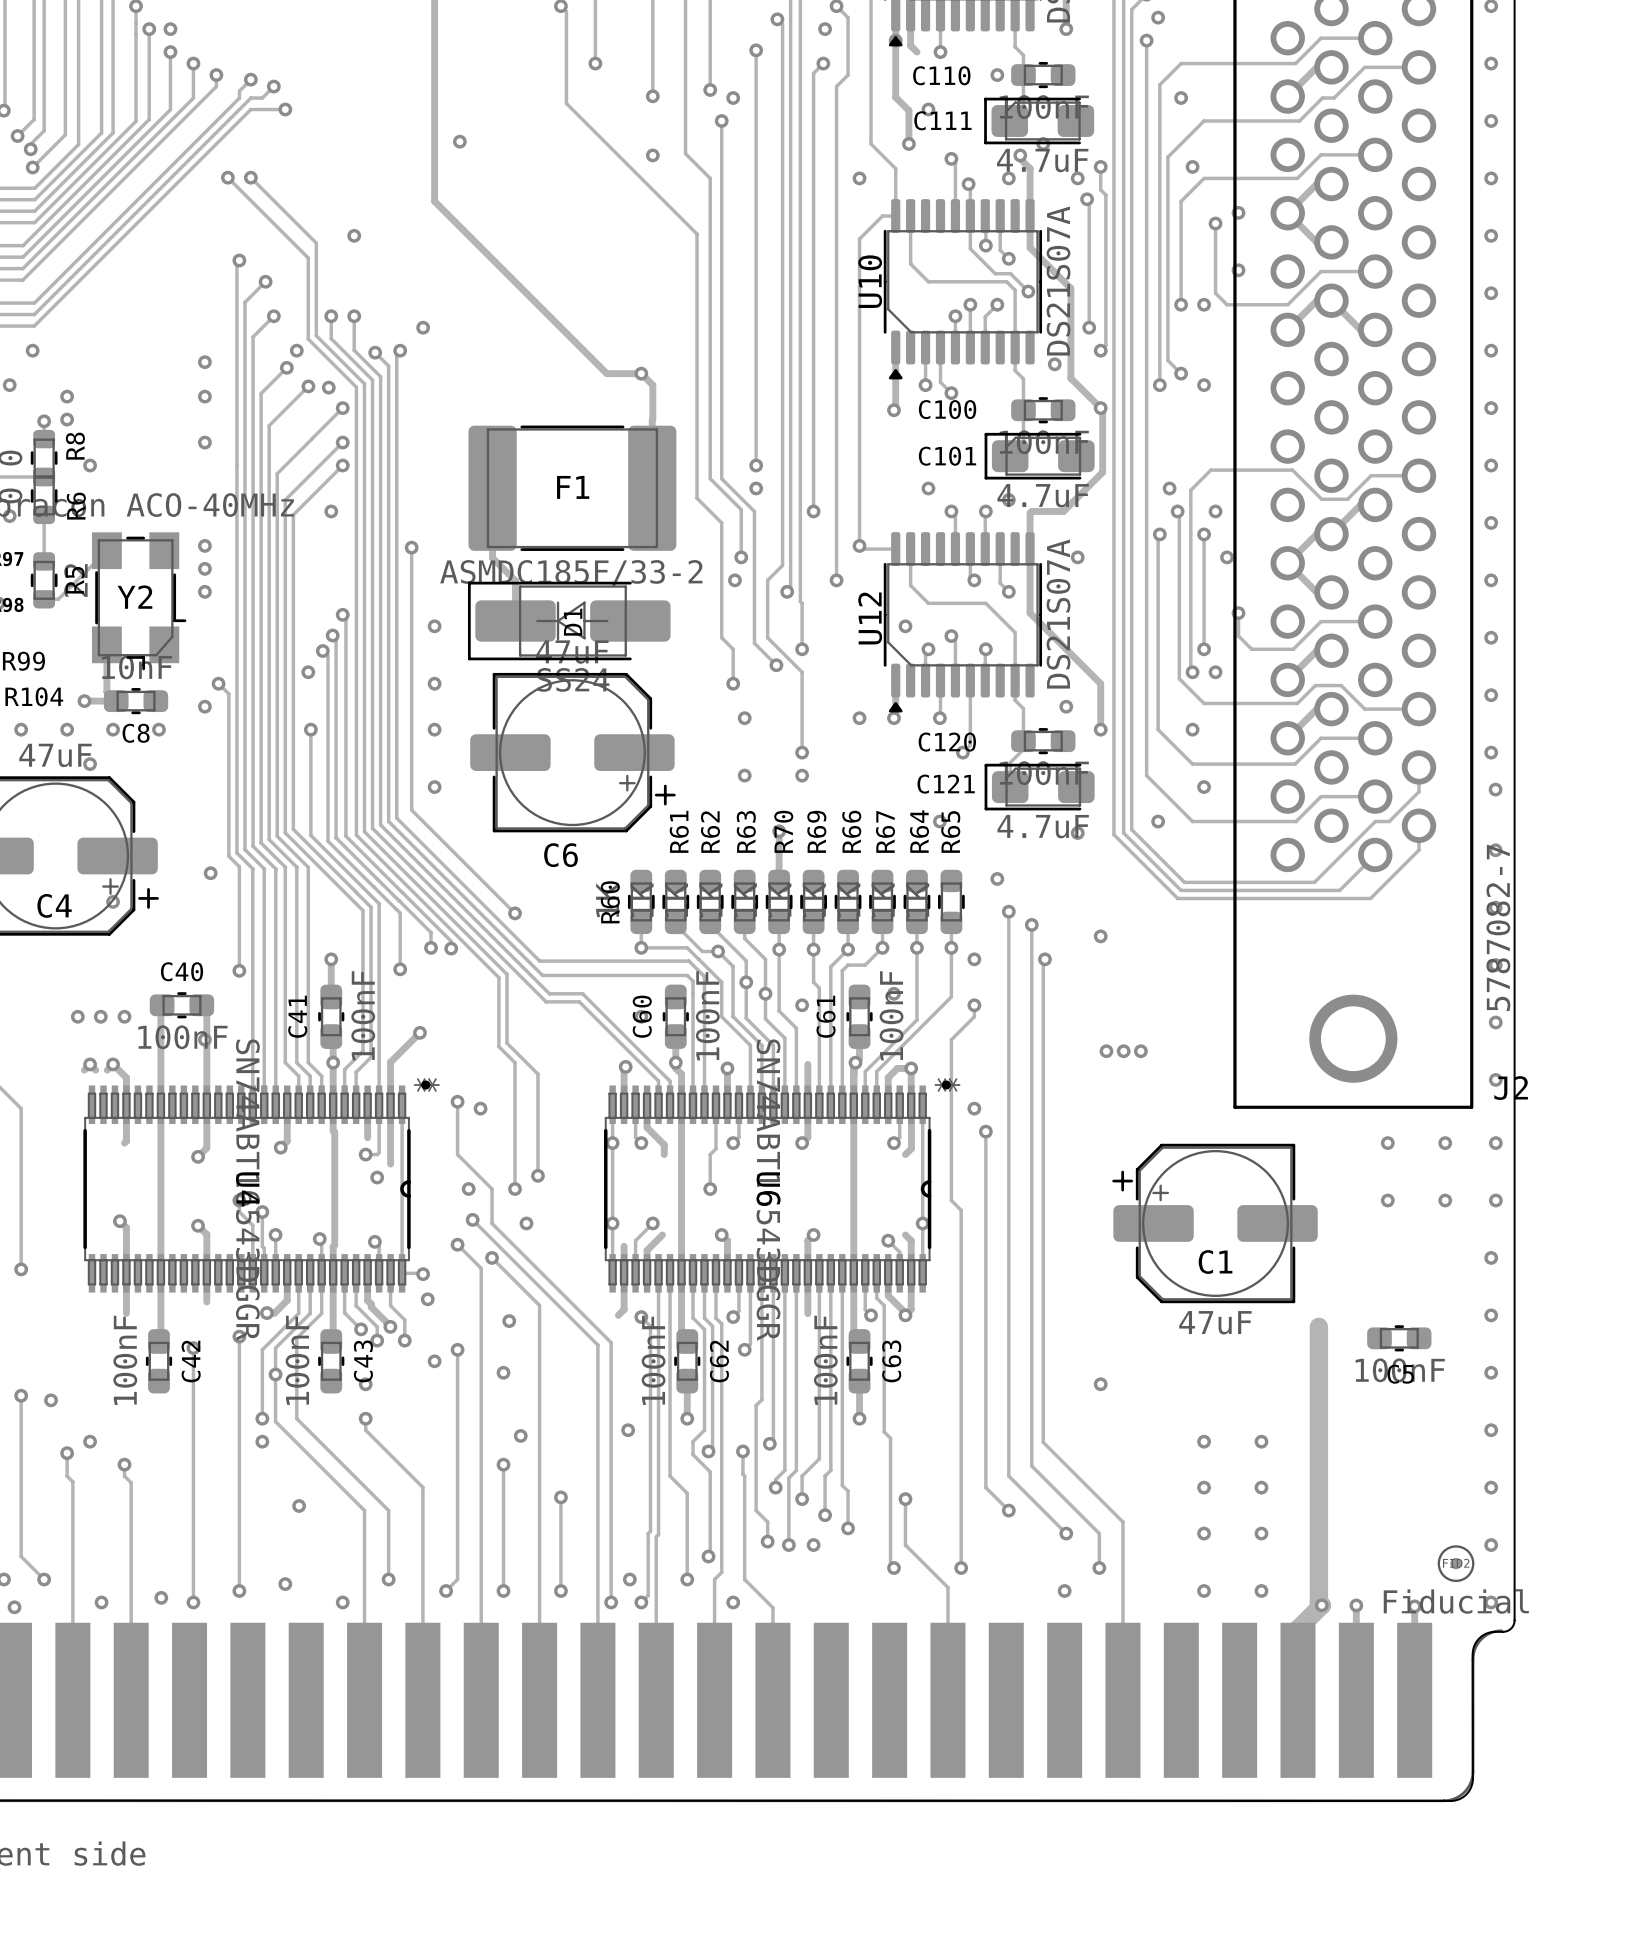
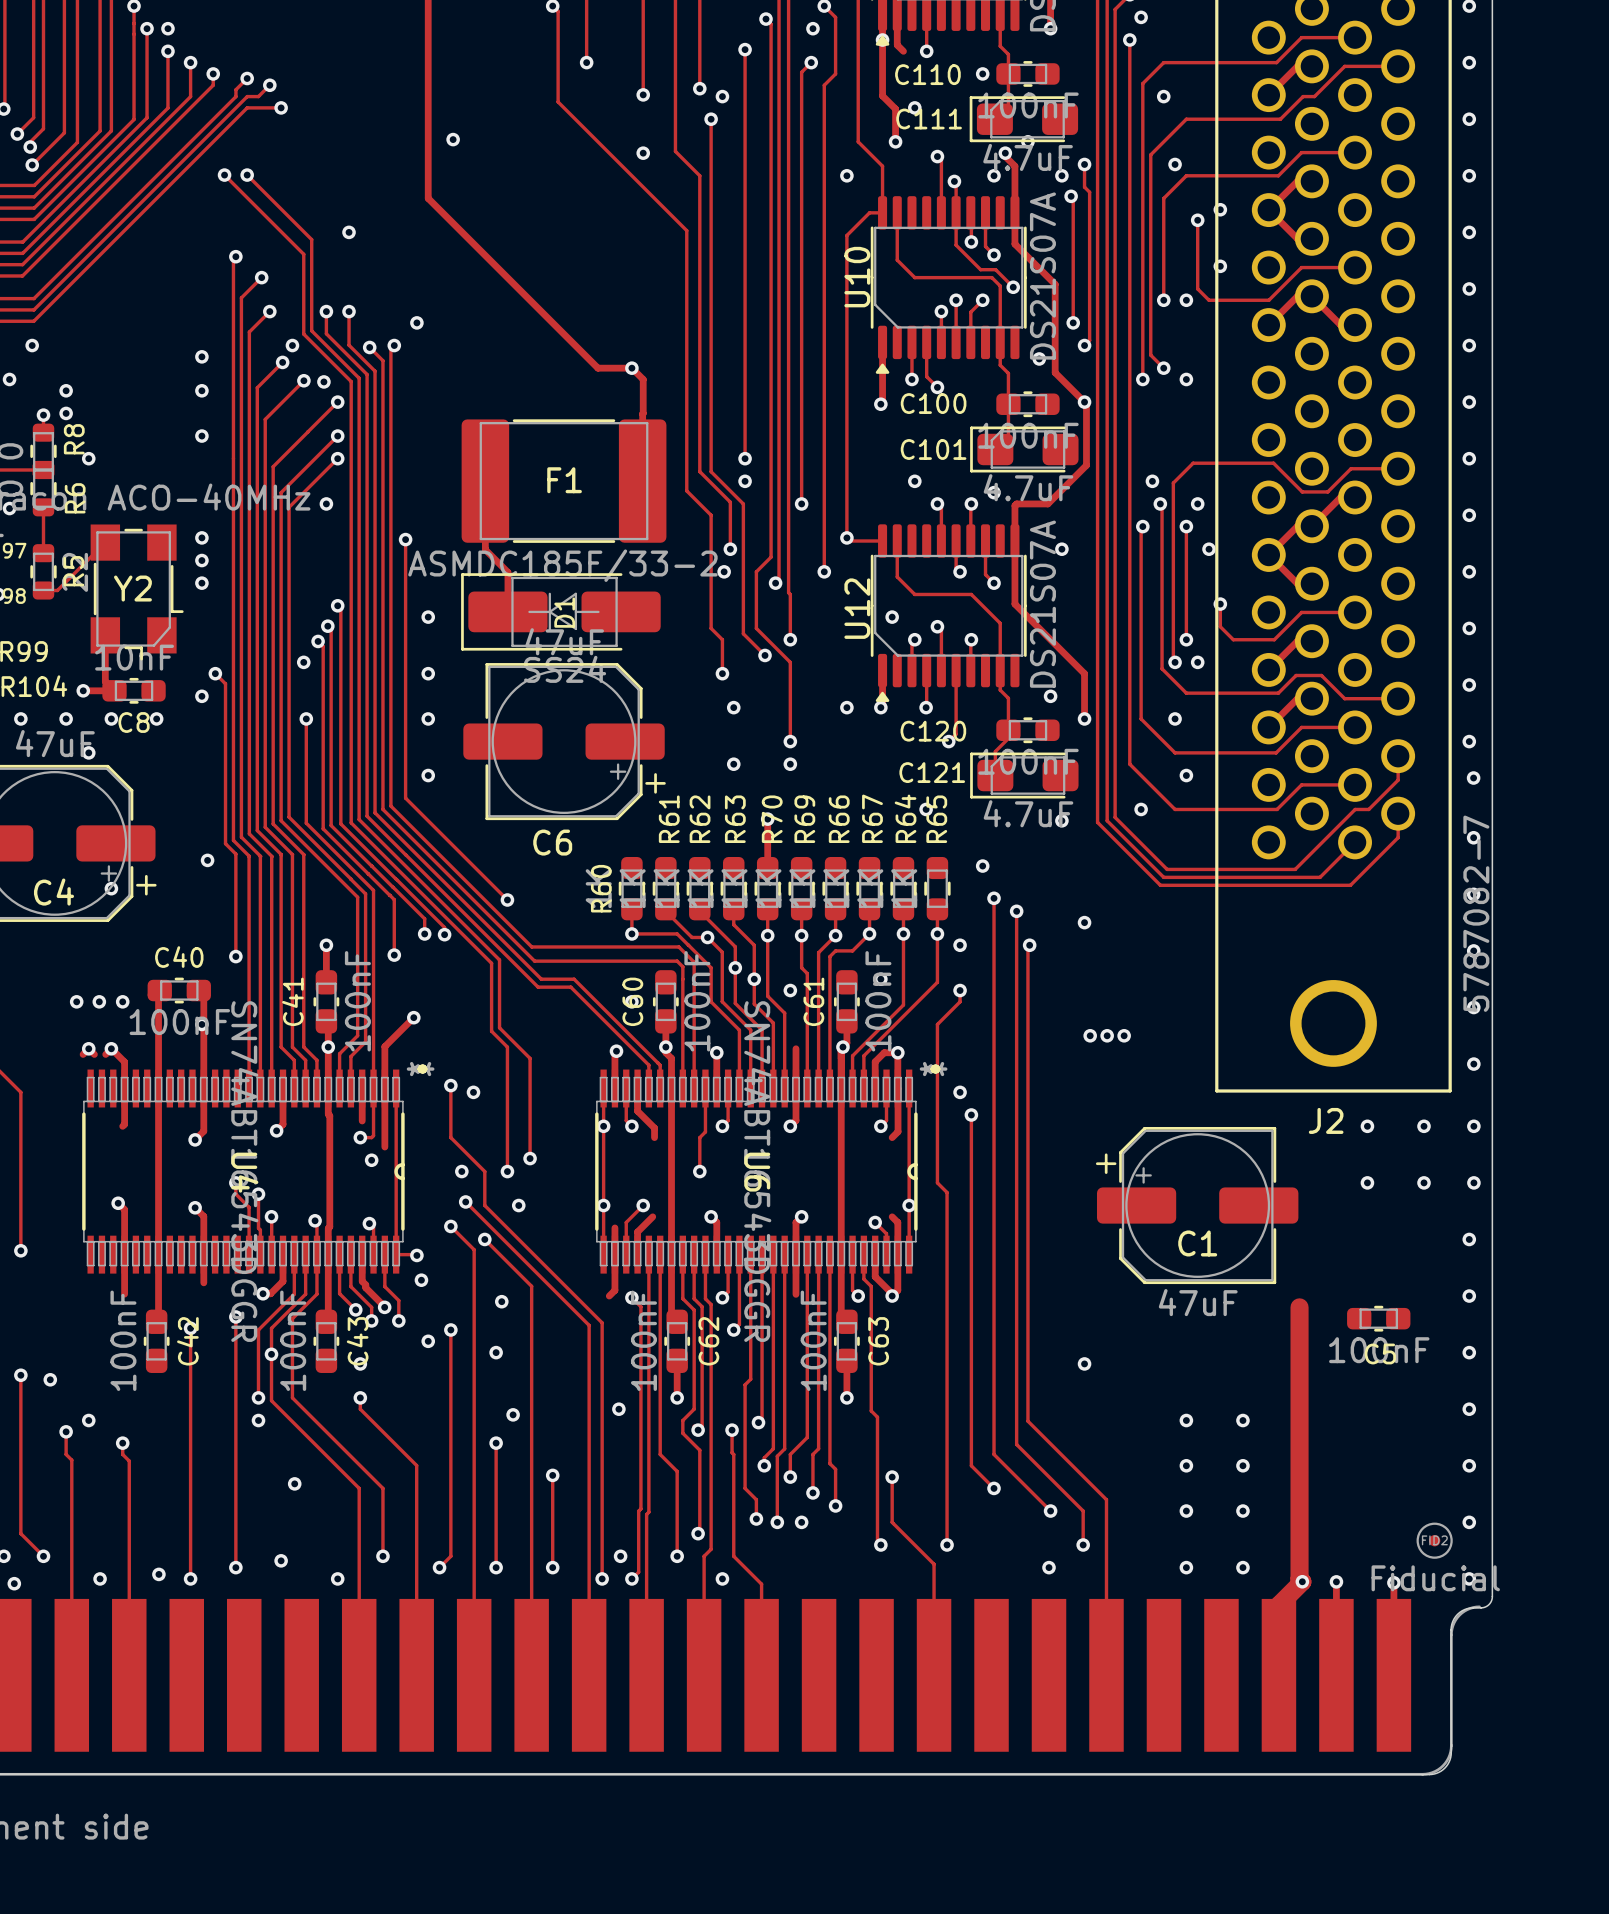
J2 name position: J2 (1511, 1088) -> J2 (1326, 1120)

